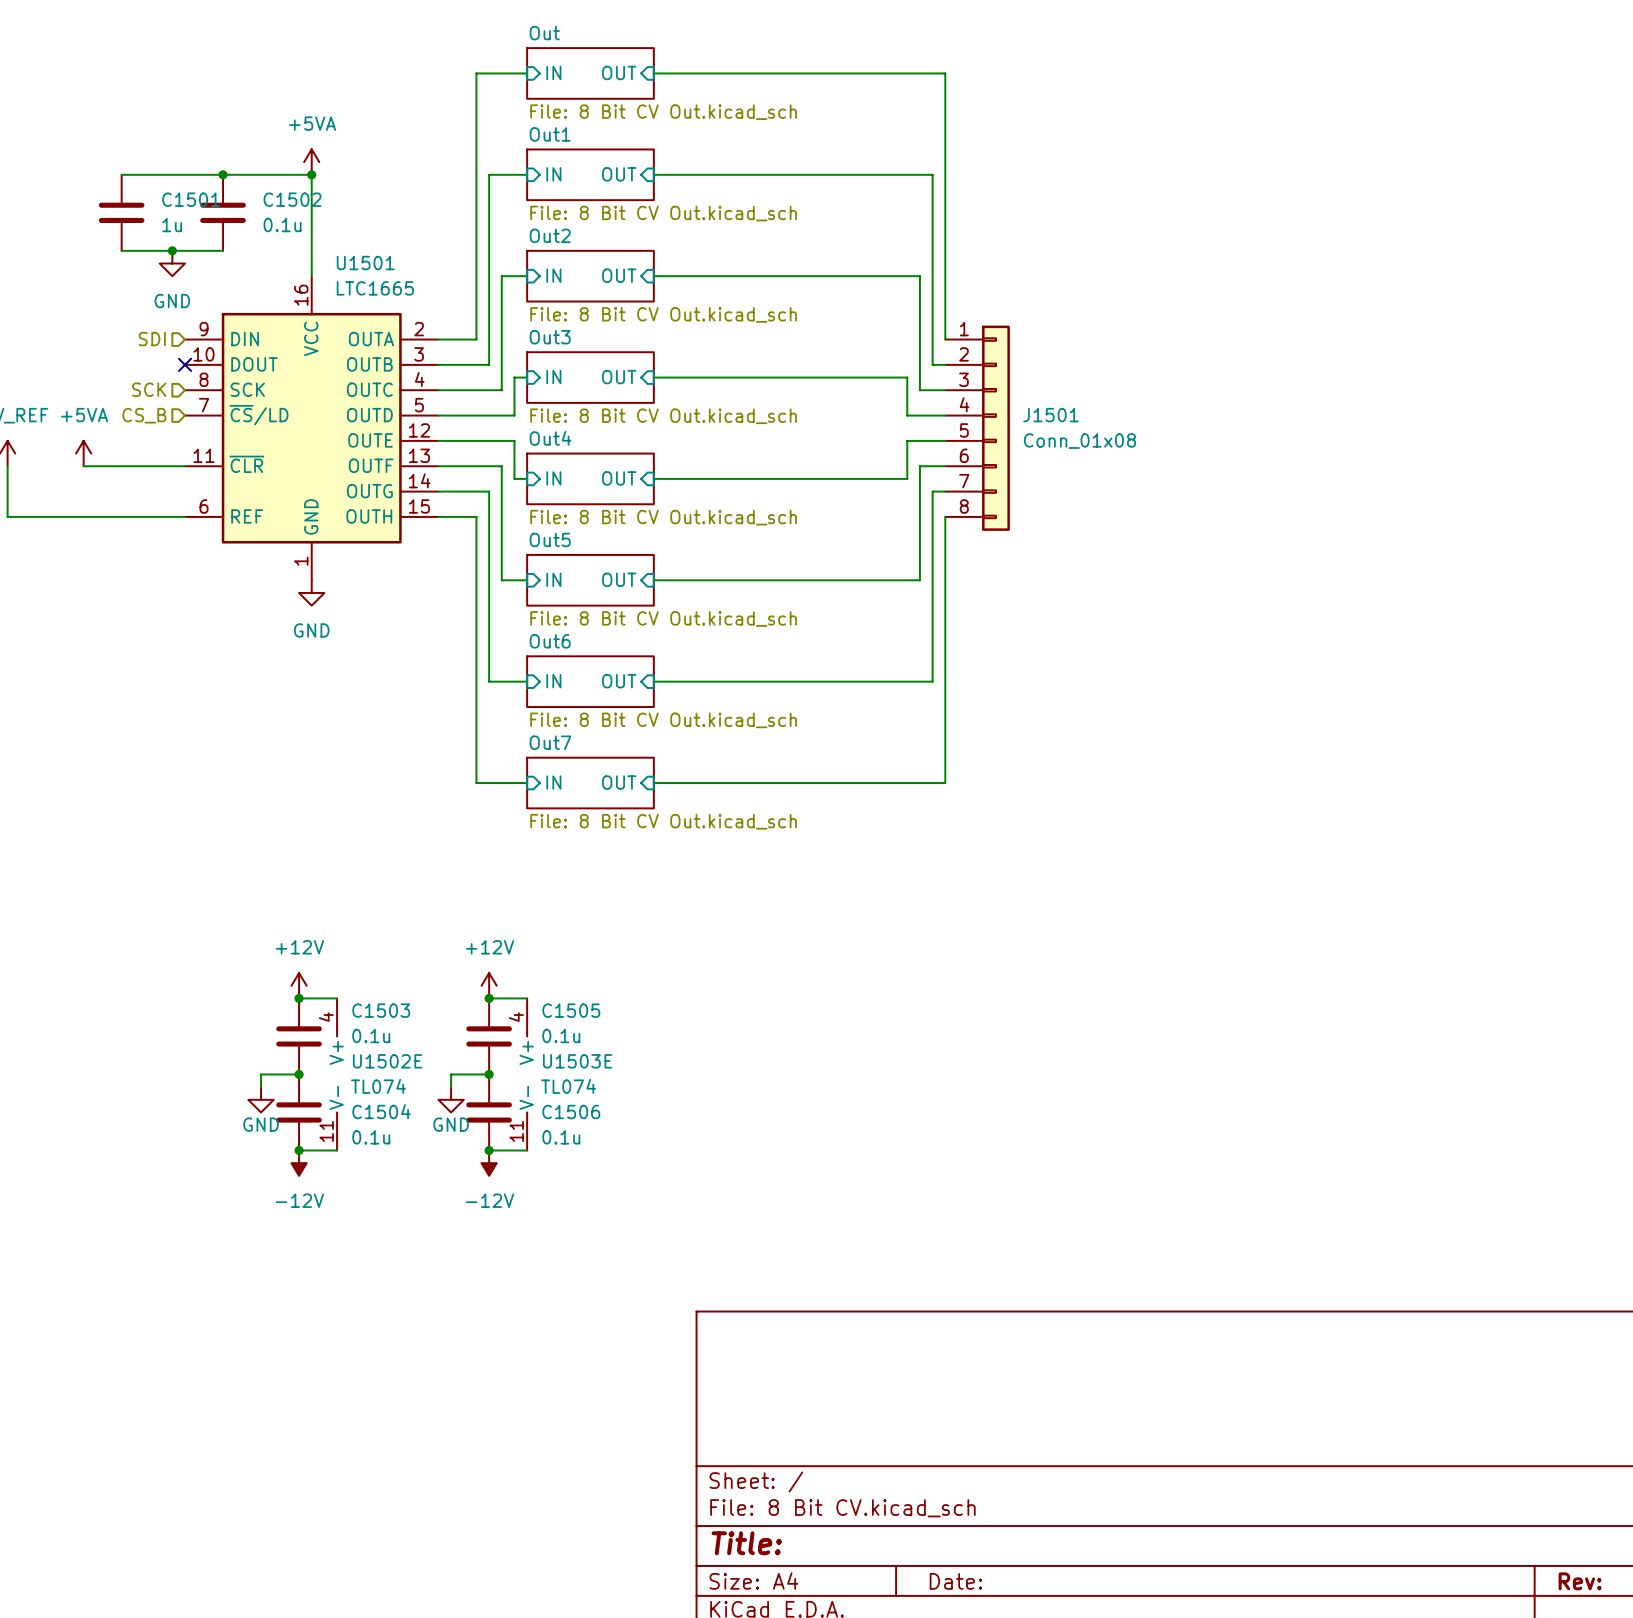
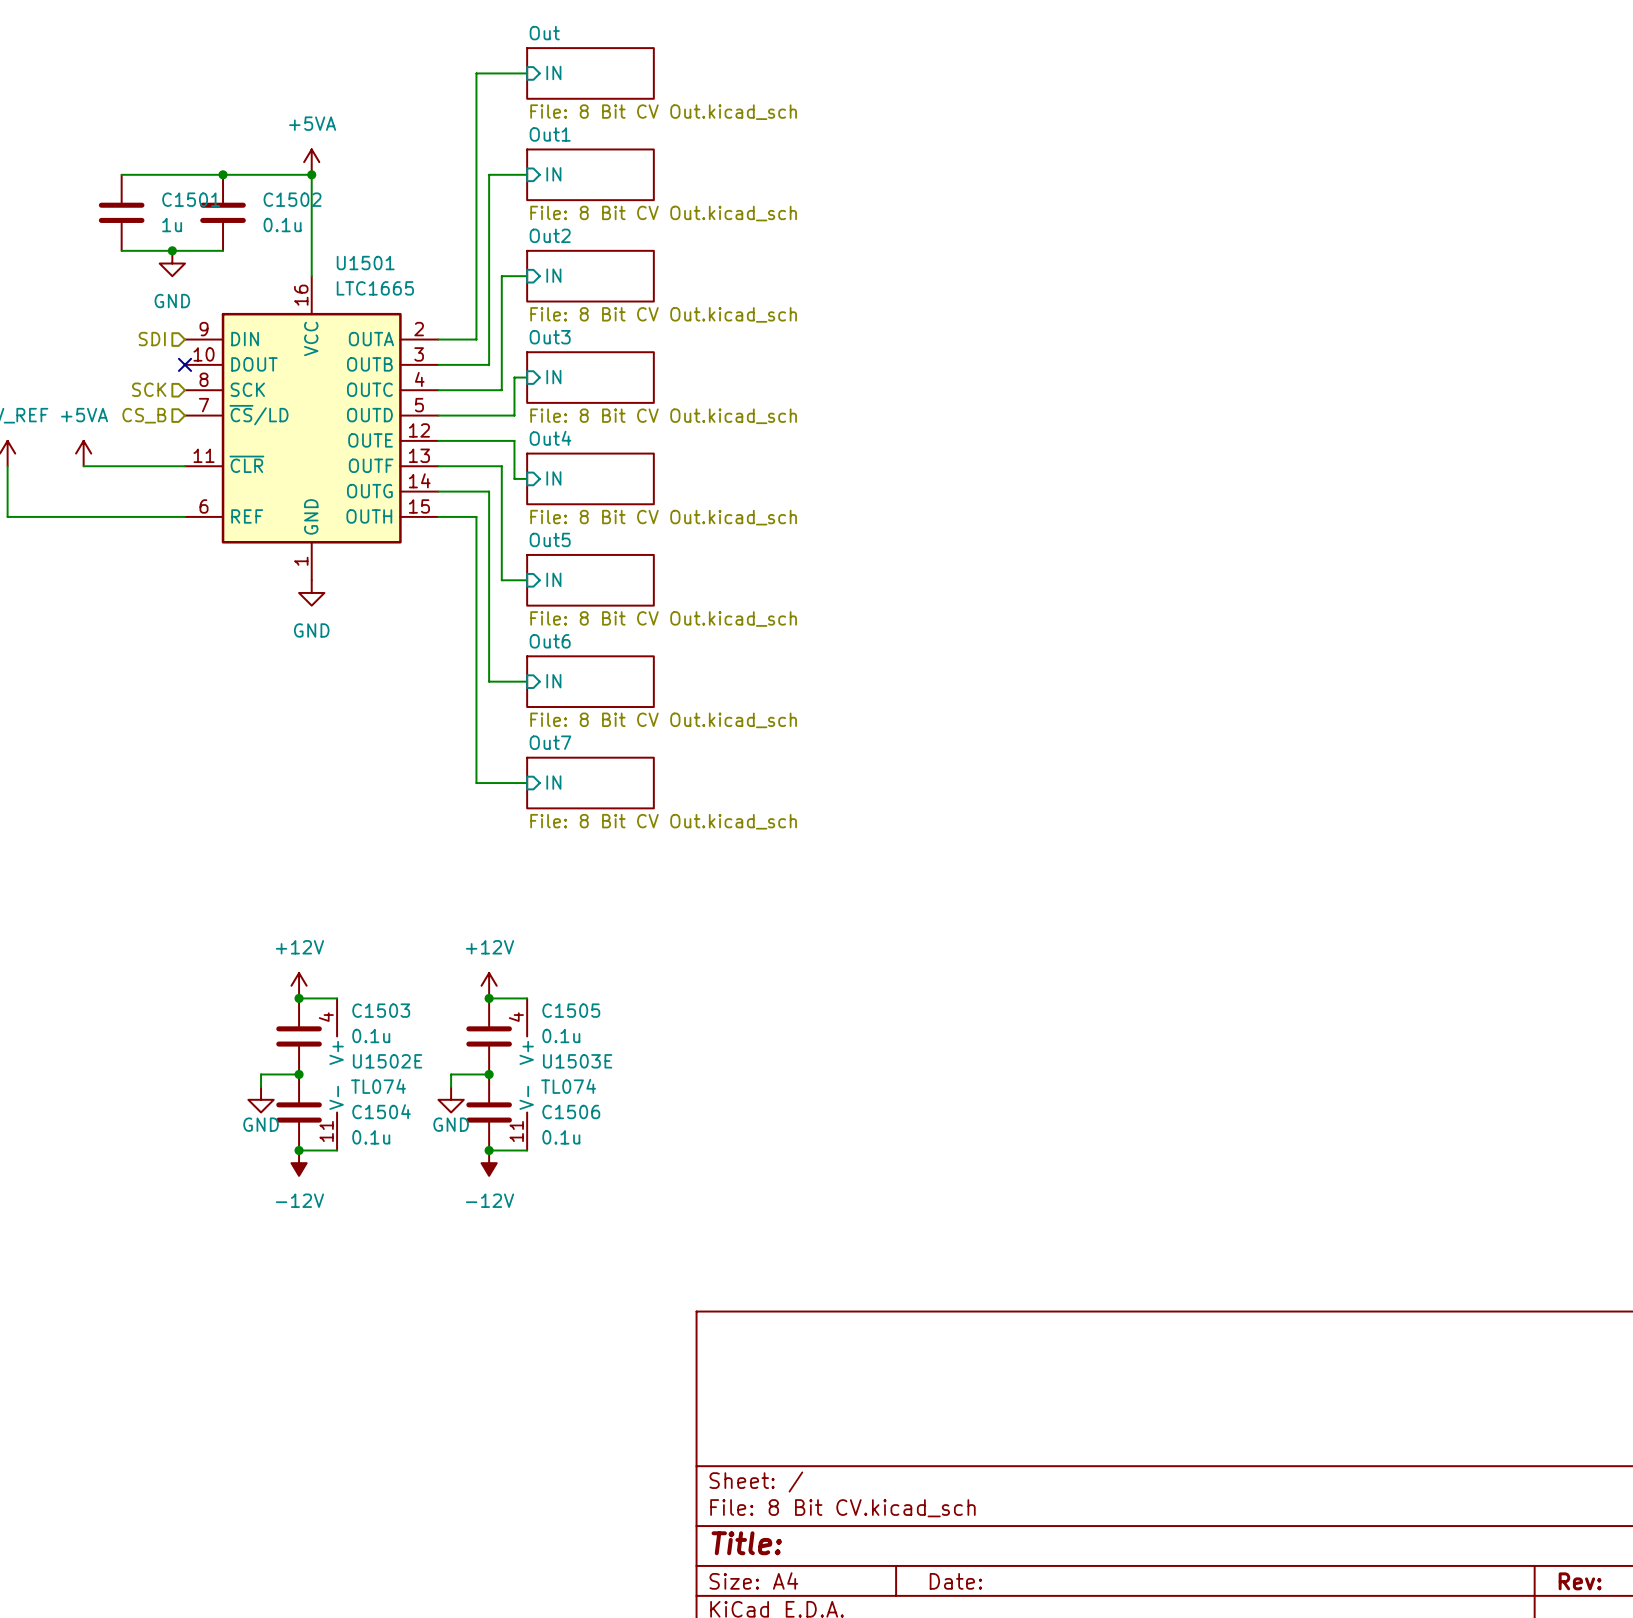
sheet pin: OUT (619, 72) -> none
wire: (653, 73) (945, 73) (945, 339) -> none
sheet pin: OUT (619, 174) -> none
wire: (653, 174) (932, 174) (932, 364) (945, 364) -> none
sheet pin: OUT (619, 275) -> none
wire: (653, 276) (919, 276) (919, 390) (945, 390) -> none
sheet pin: OUT (619, 377) -> none
wire: (653, 377) (907, 377) (907, 415) (945, 415) -> none
J1501: Conn_01x08 (977, 428) -> none
wire: (945, 440) (907, 440) (907, 478) (653, 478) -> none
wire: (945, 466) (919, 466) (919, 580) (653, 580) -> none
sheet pin: OUT (619, 478) -> none
wire: (945, 491) (932, 491) (932, 681) (653, 681) -> none
wire: (945, 516) (945, 783) (653, 783) -> none
sheet pin: OUT (619, 579) -> none
sheet pin: OUT (619, 681) -> none
sheet pin: OUT (619, 782) -> none

